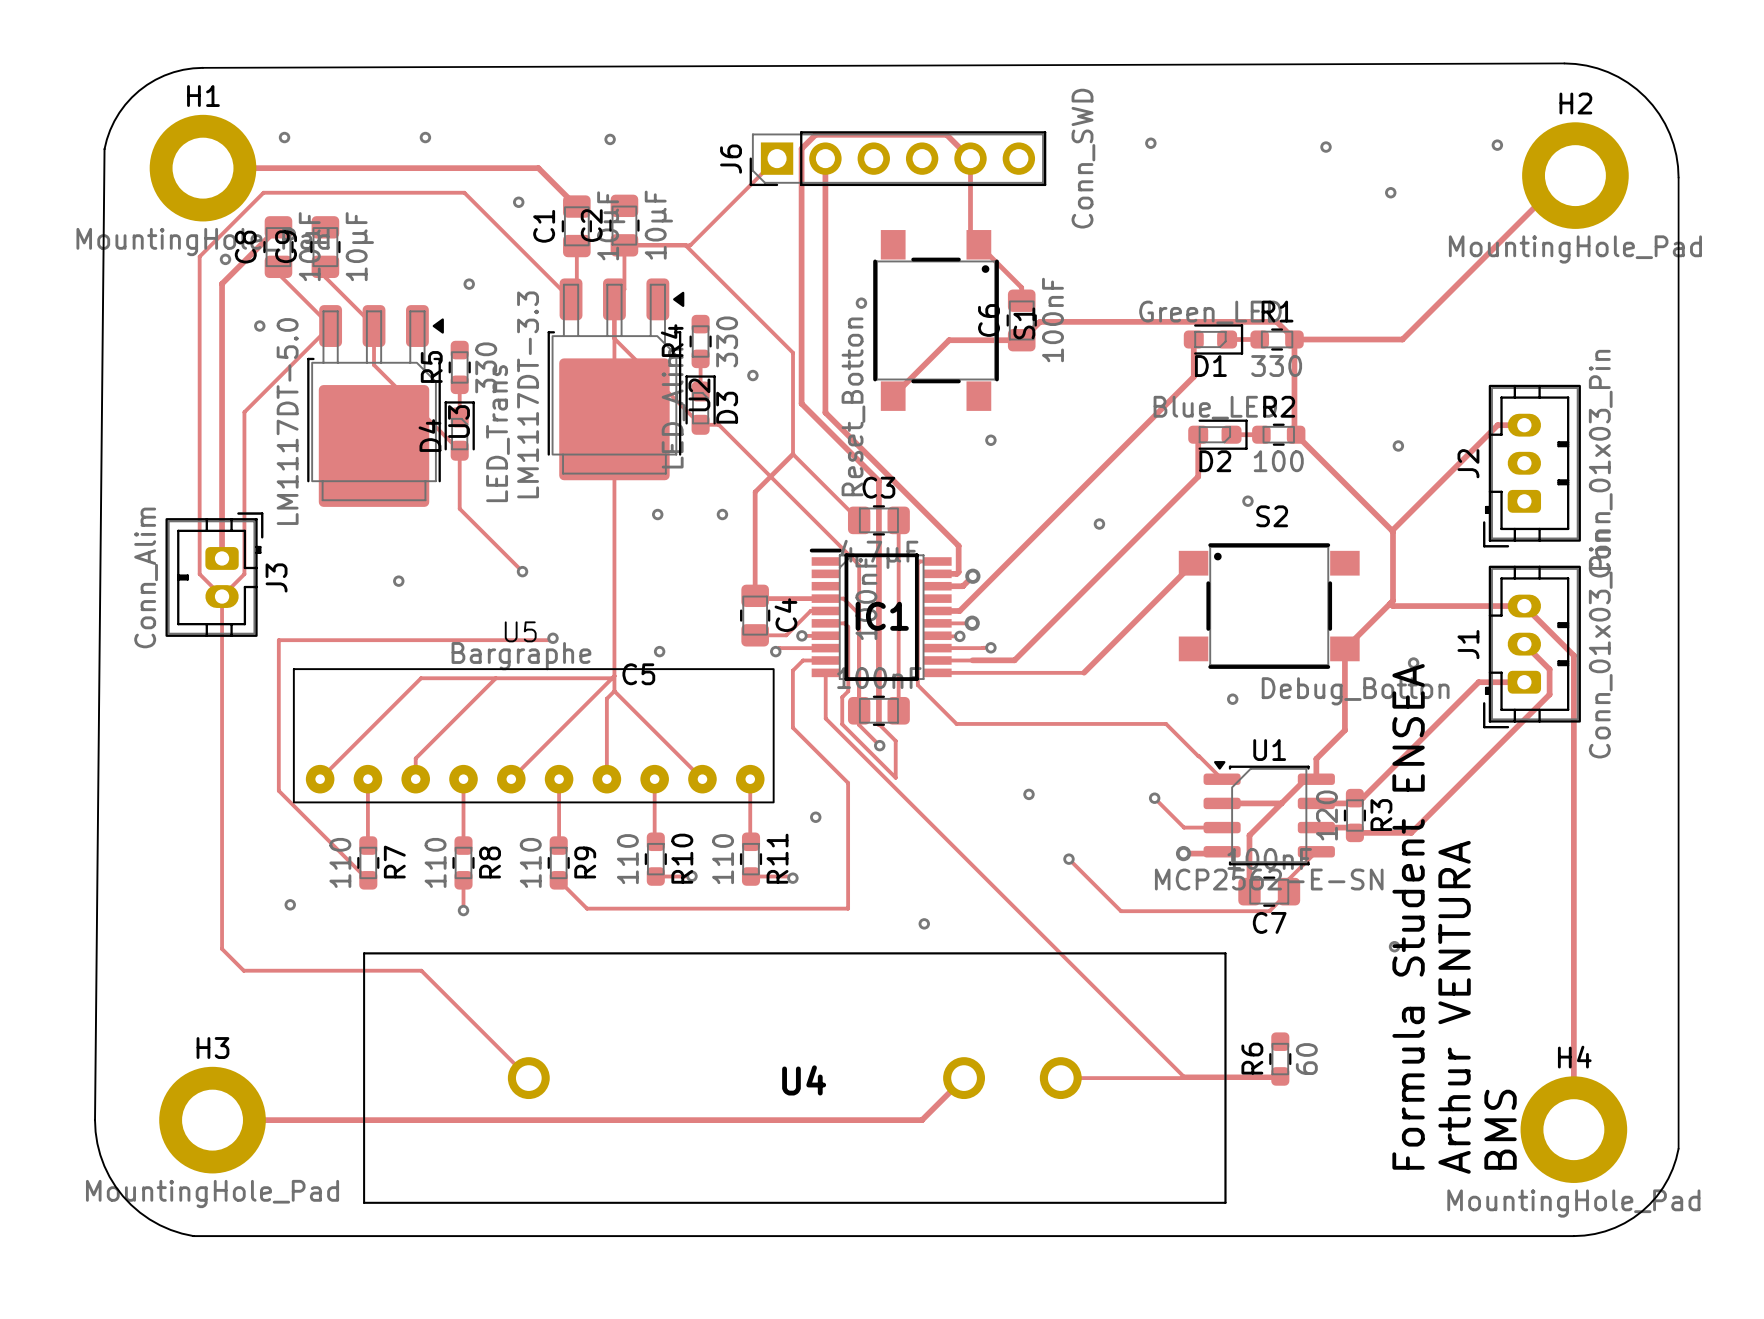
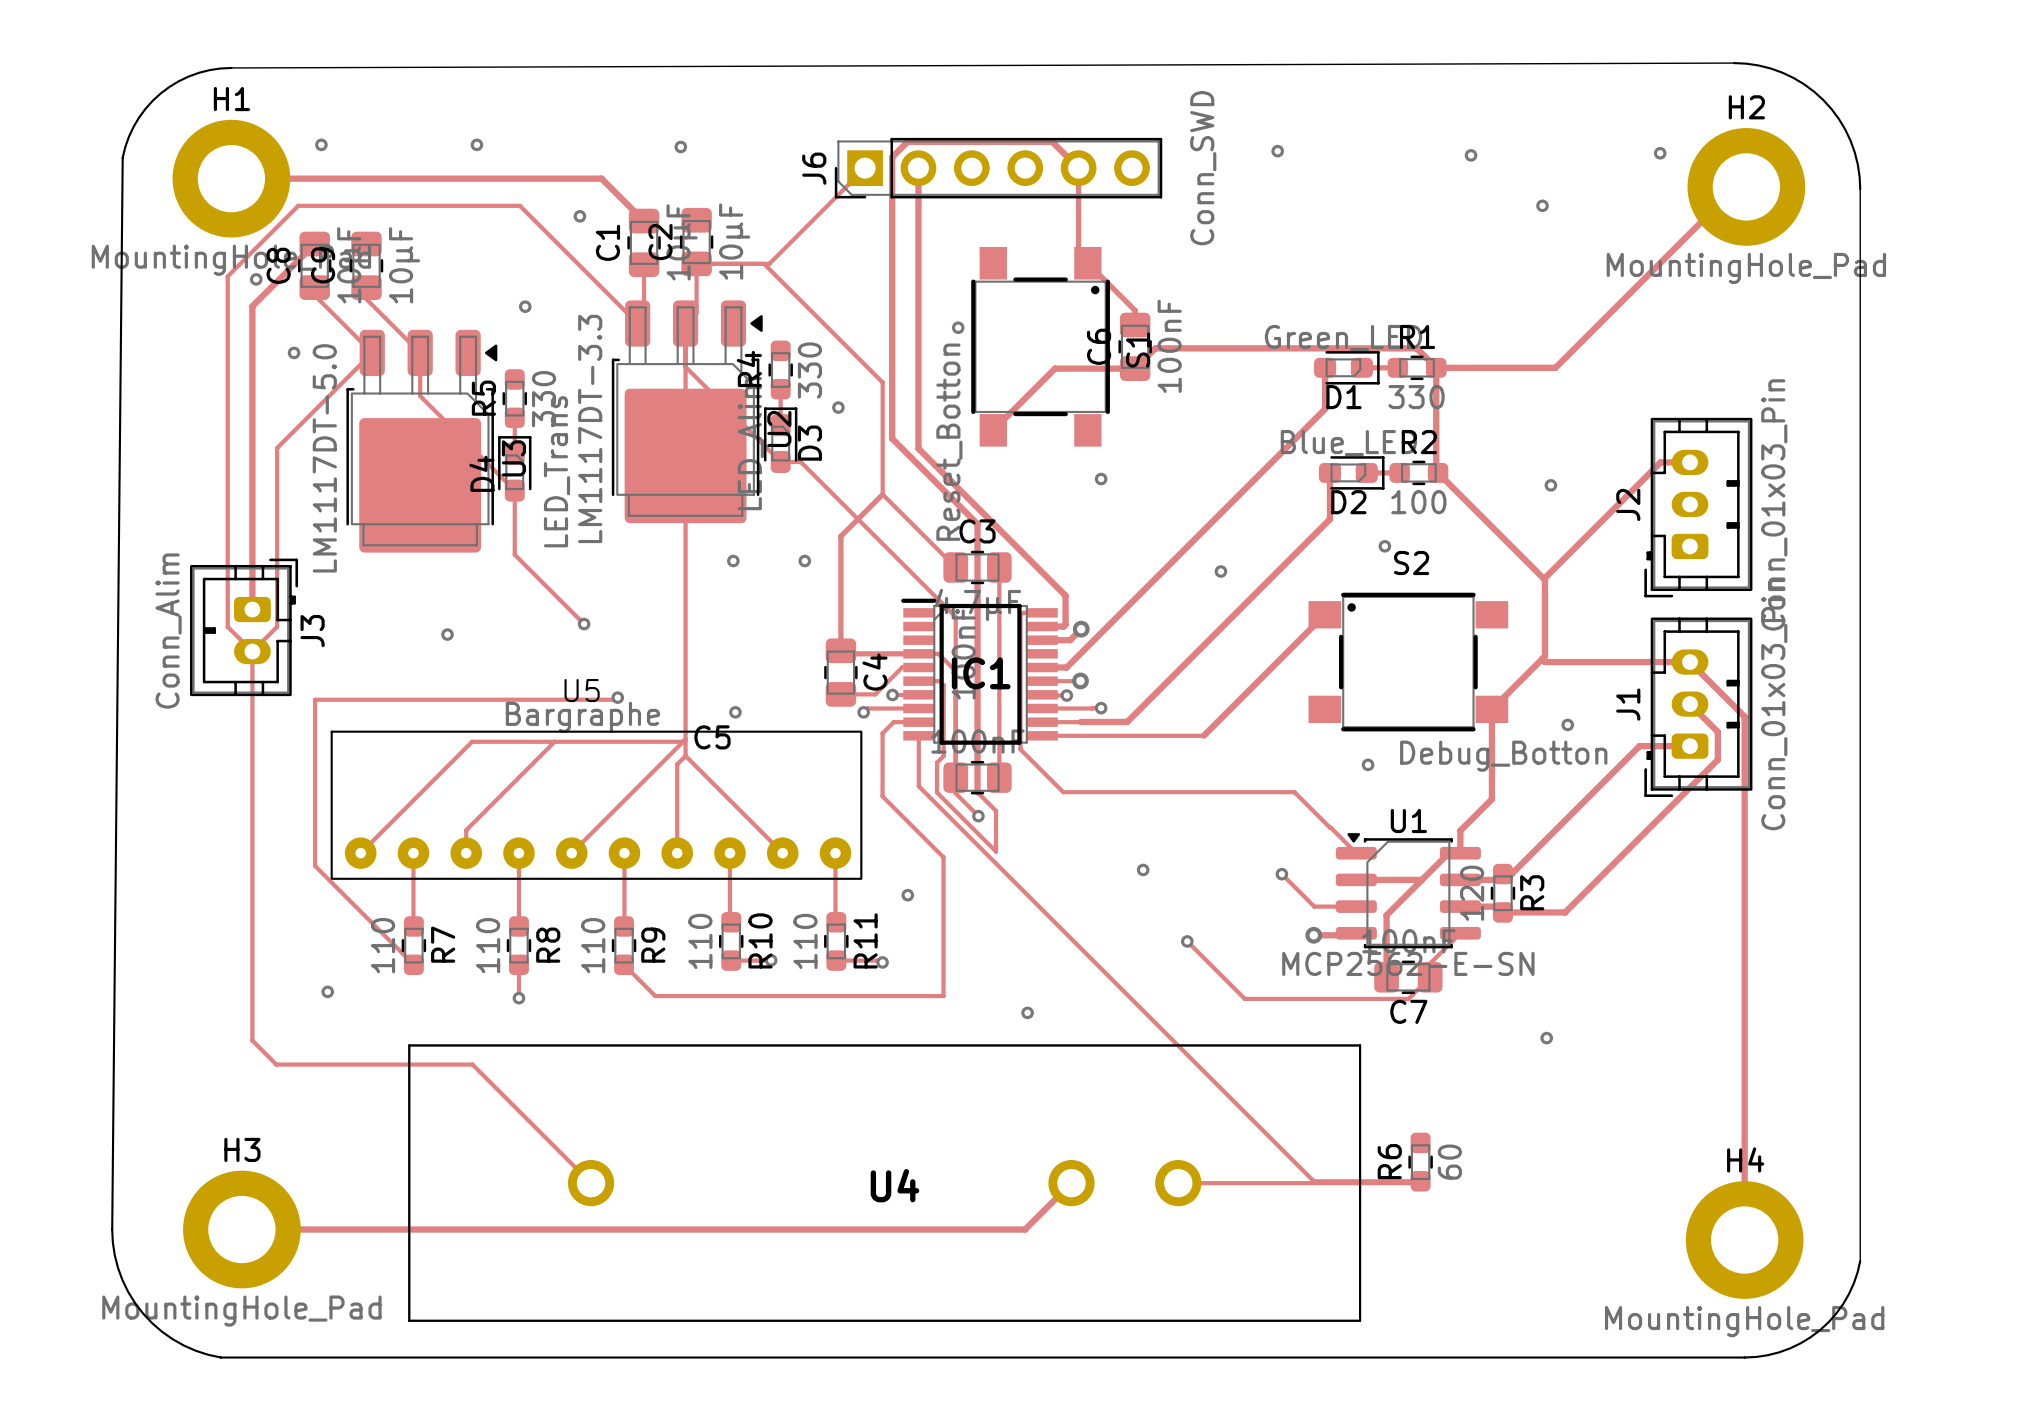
text: Formula Student ENSEA (1408, 916) -> none
text: Arthur VENTURA (1454, 1007) -> none
text: BMS (1500, 1129) -> none

